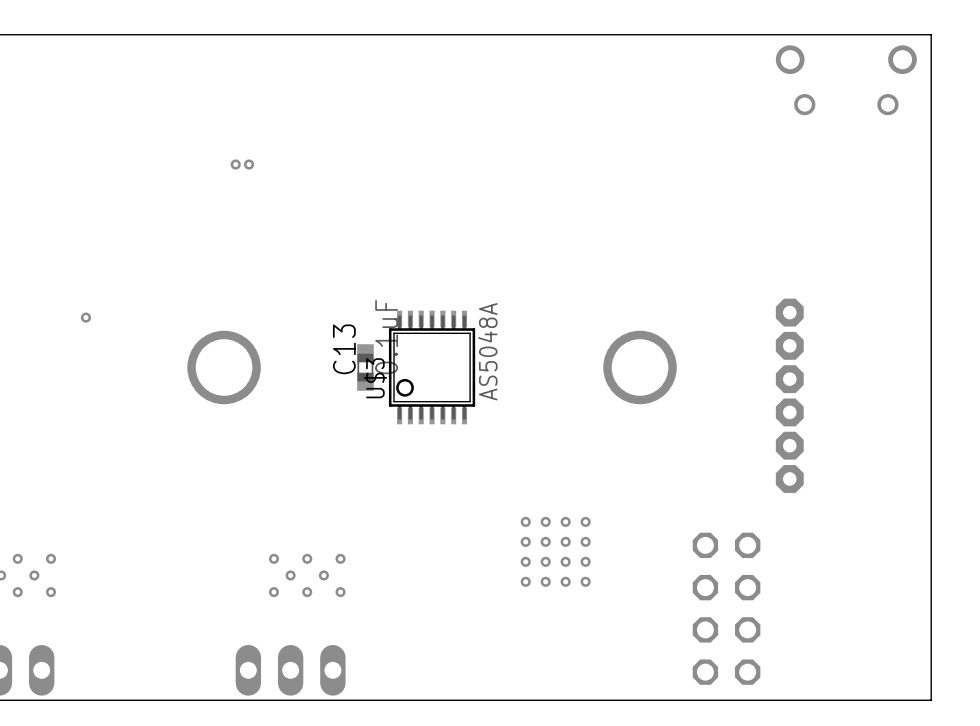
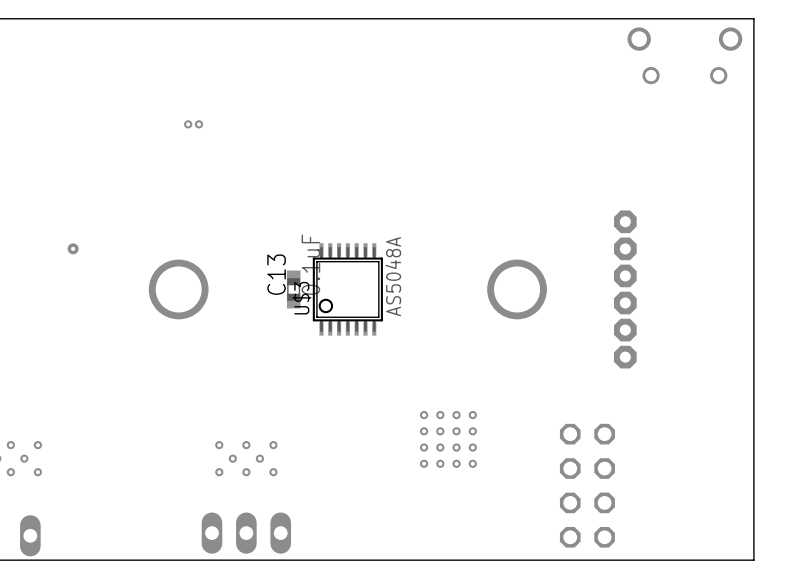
part footprint: [80, 312, 92, 323] -> [67, 243, 79, 255]
part position: (789, 395) -> (625, 289)
part position: (290, 670) -> (246, 533)

